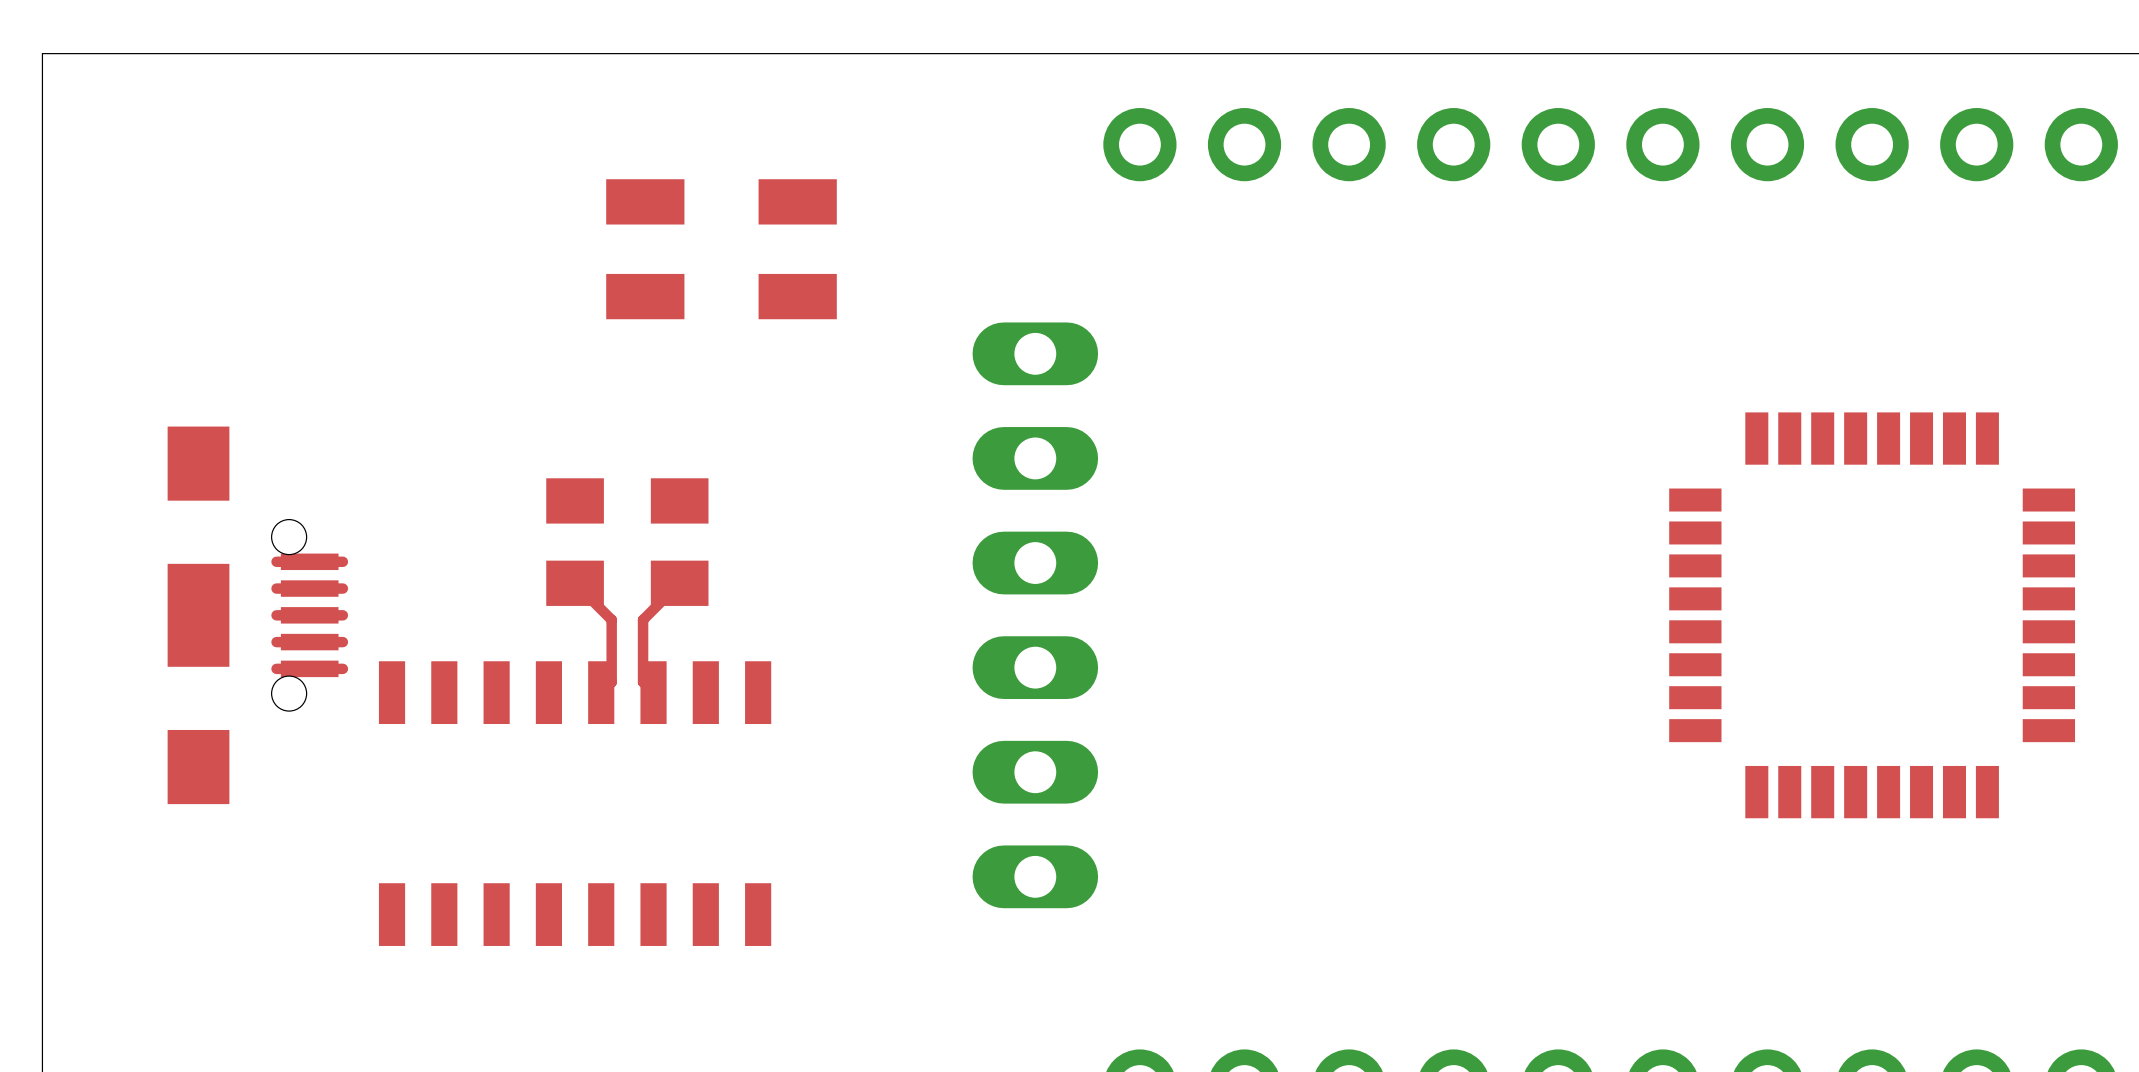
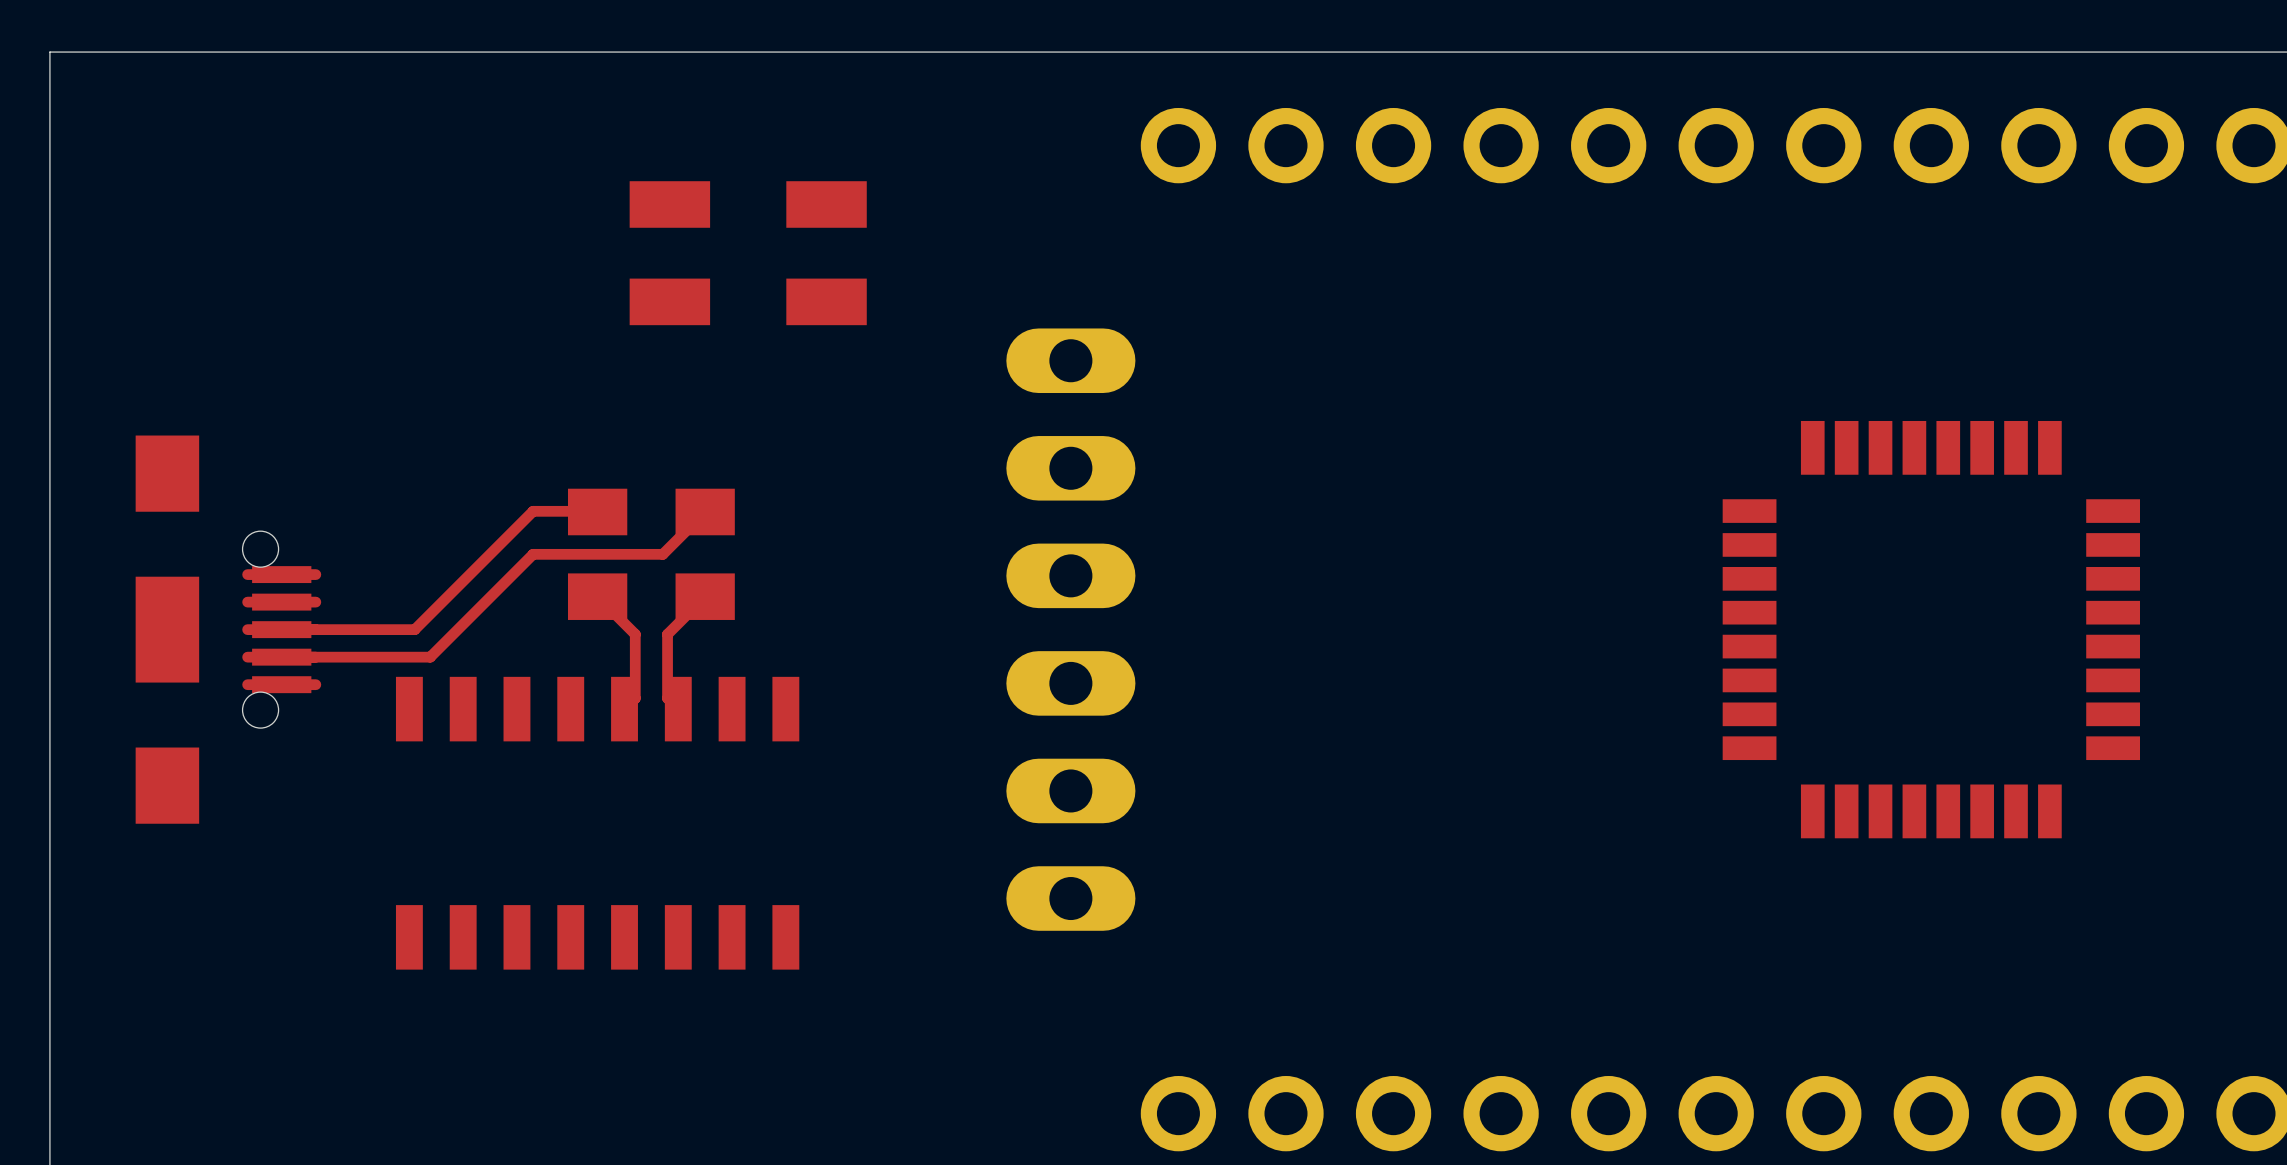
top track: none -> (597, 512) (533, 511) (414, 629) (281, 629)
top track: none -> (705, 512) (662, 554) (533, 554) (430, 657) (281, 657)
part position: (257, 615) -> (228, 629)

